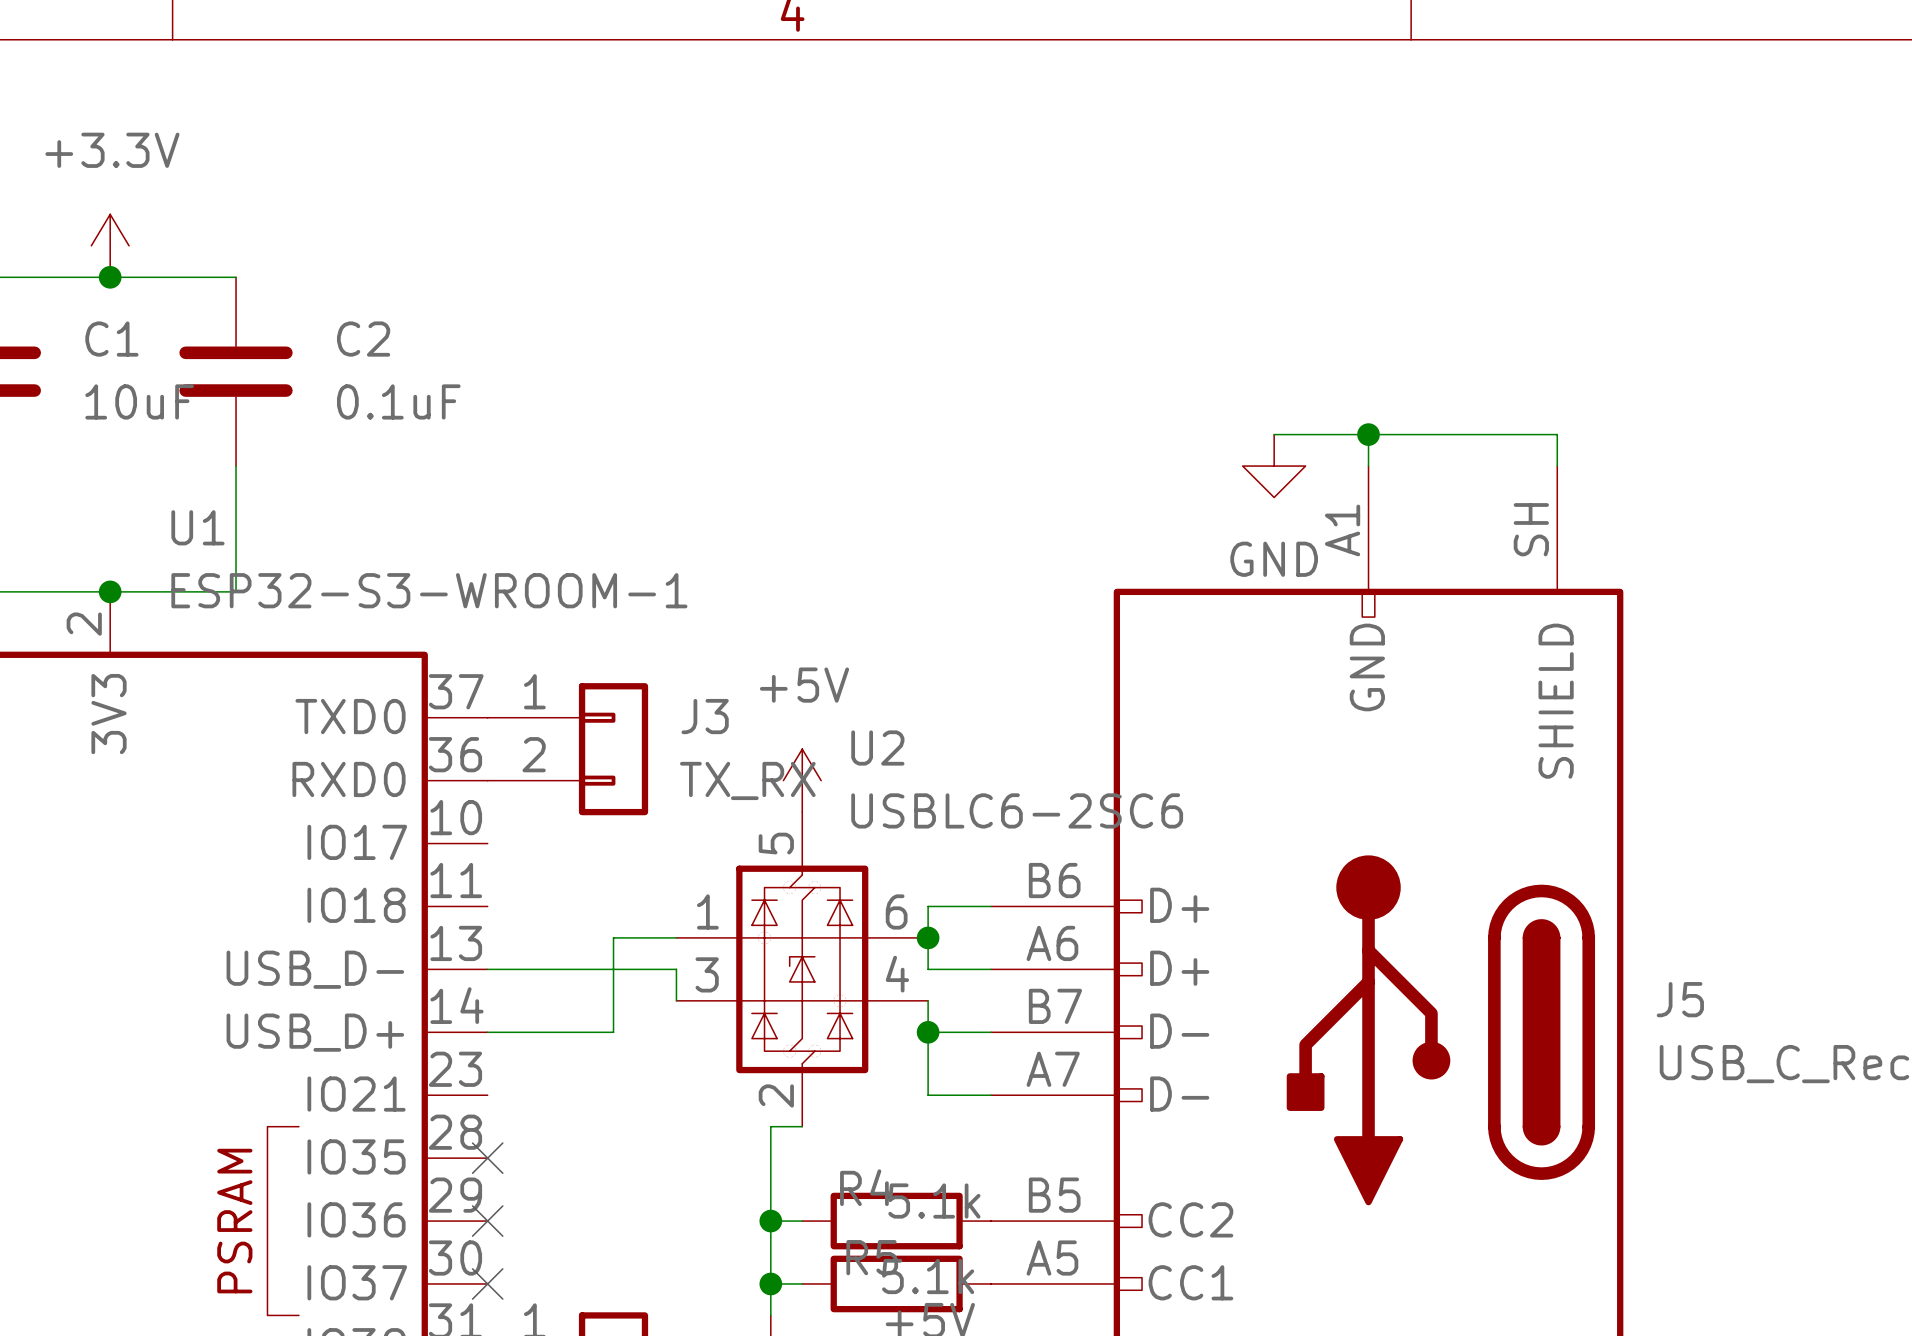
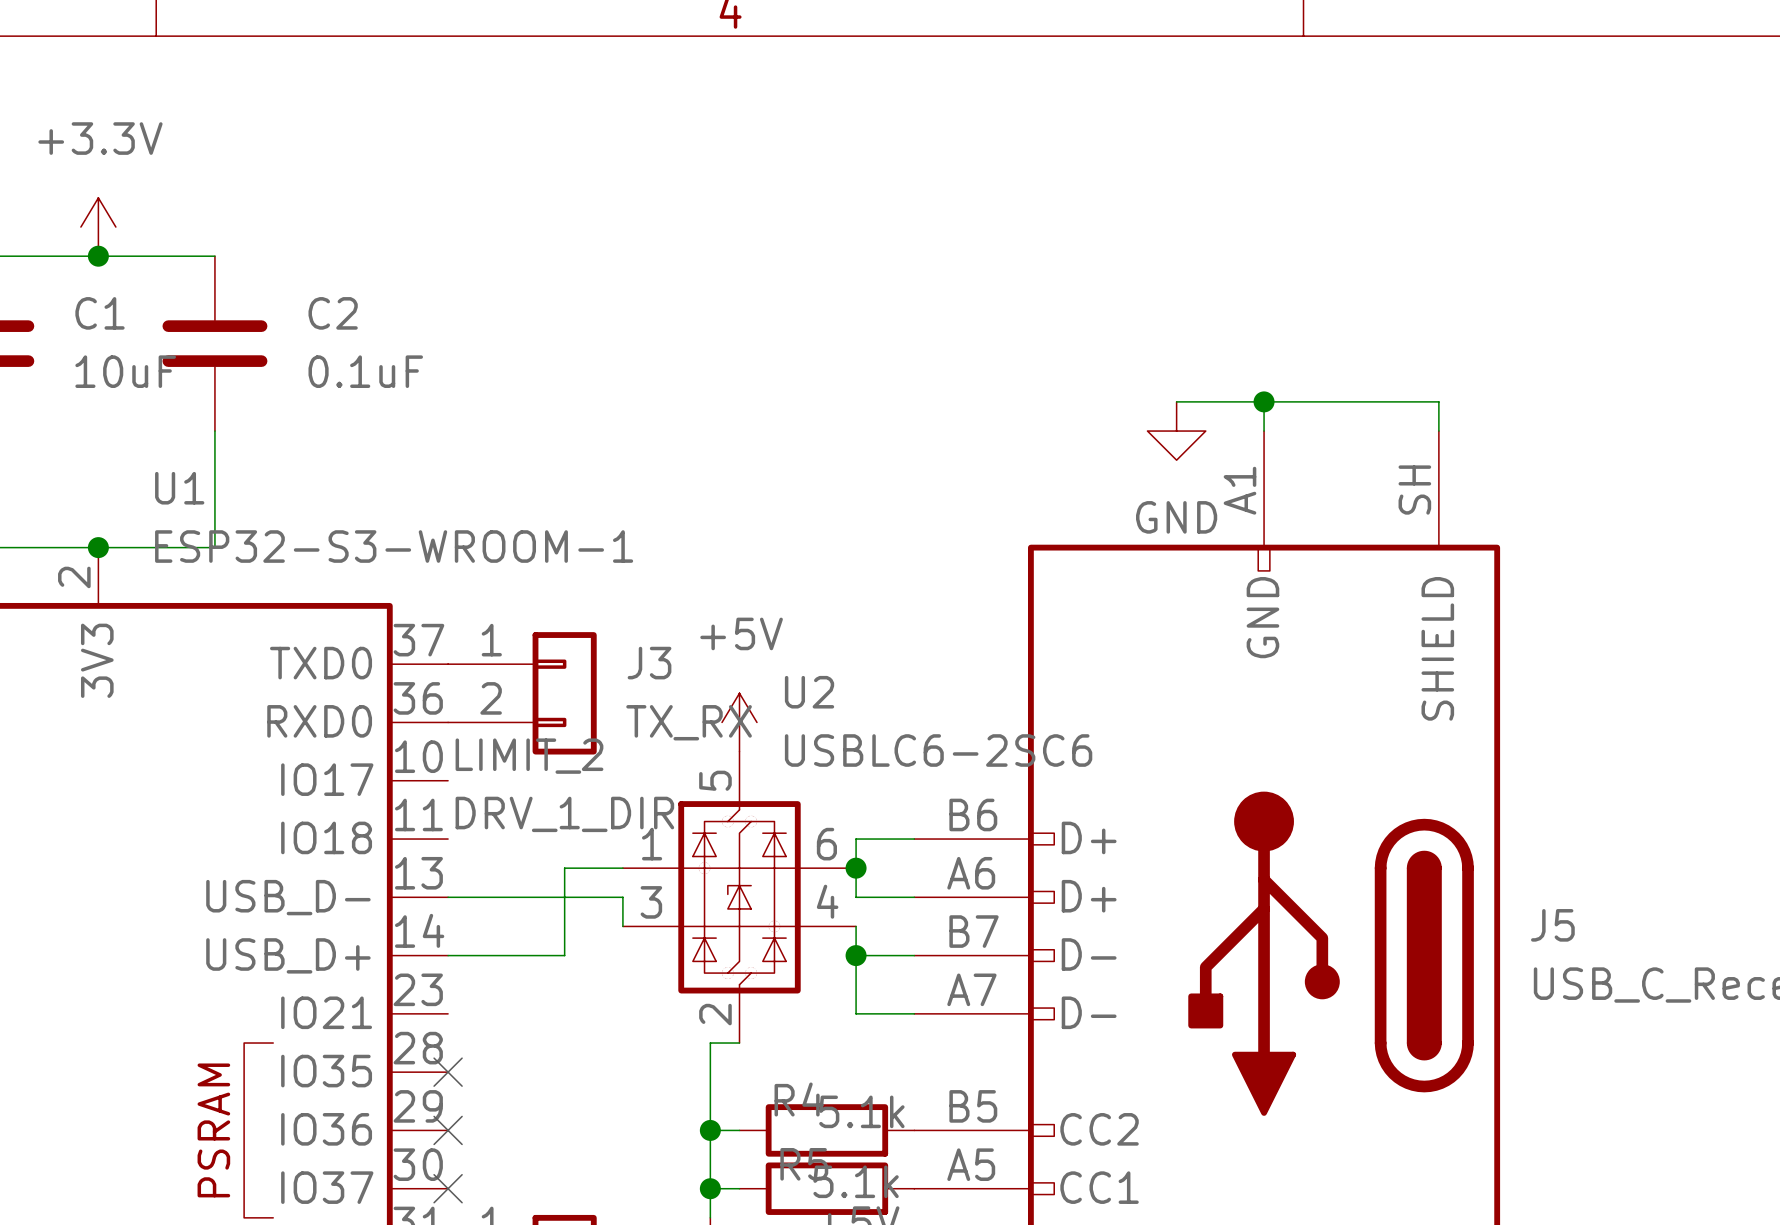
label: none -> LIMIT_2 (529, 756)
label: none -> DRV_1_DIR (564, 814)

